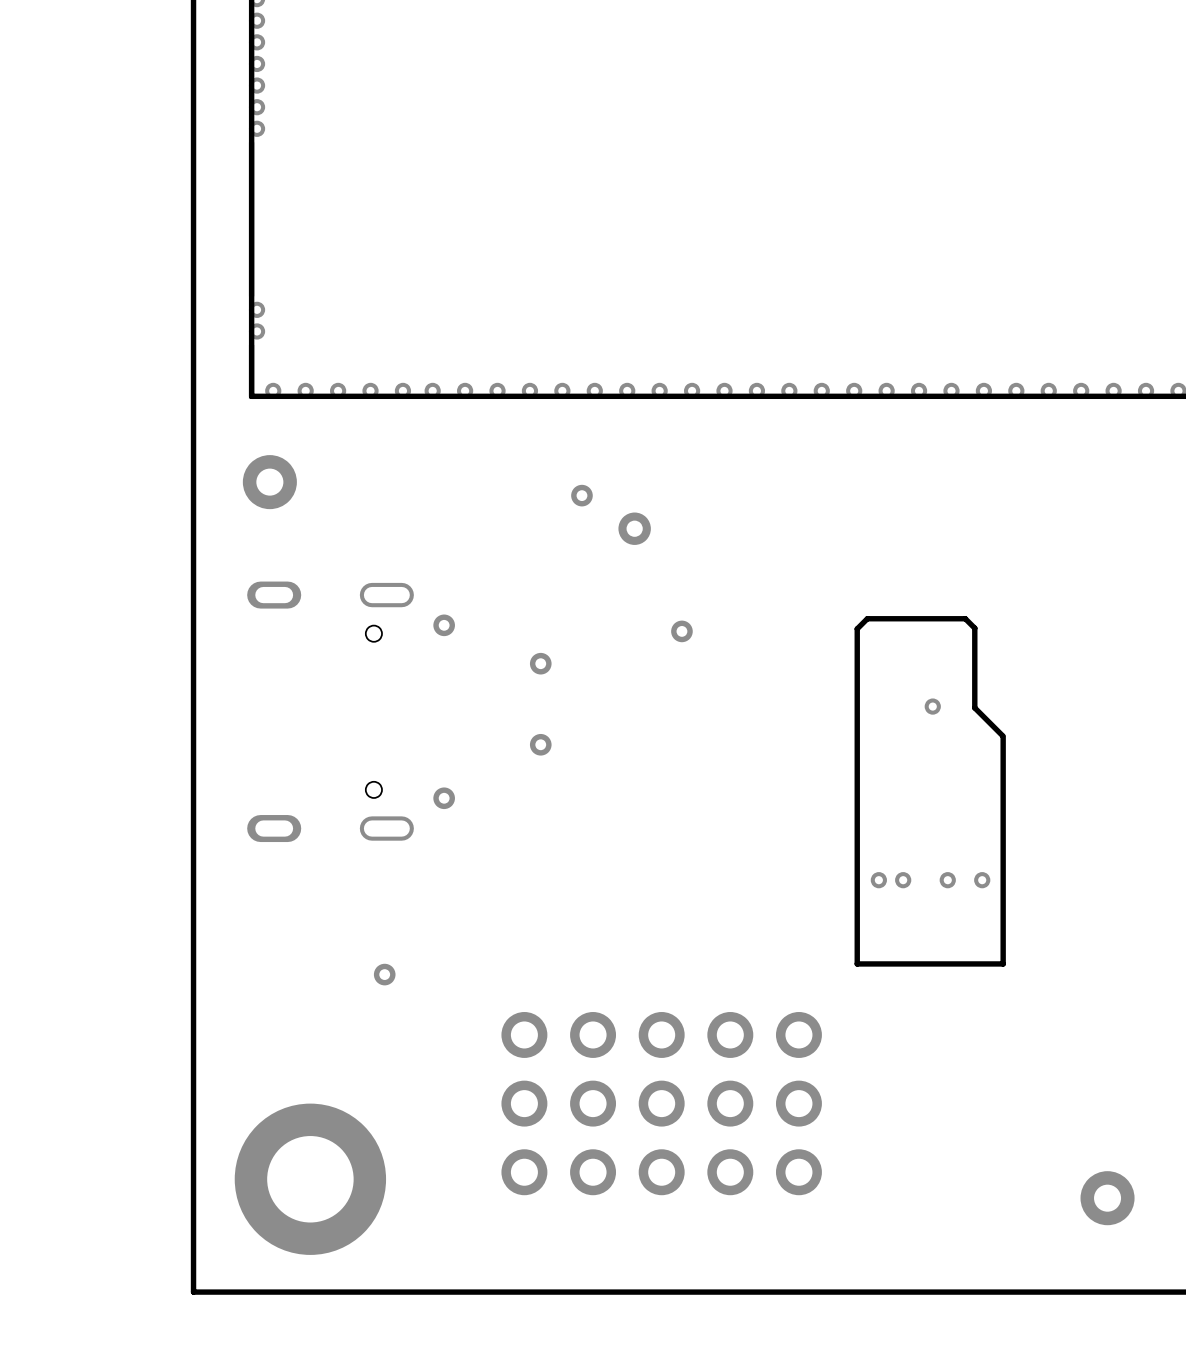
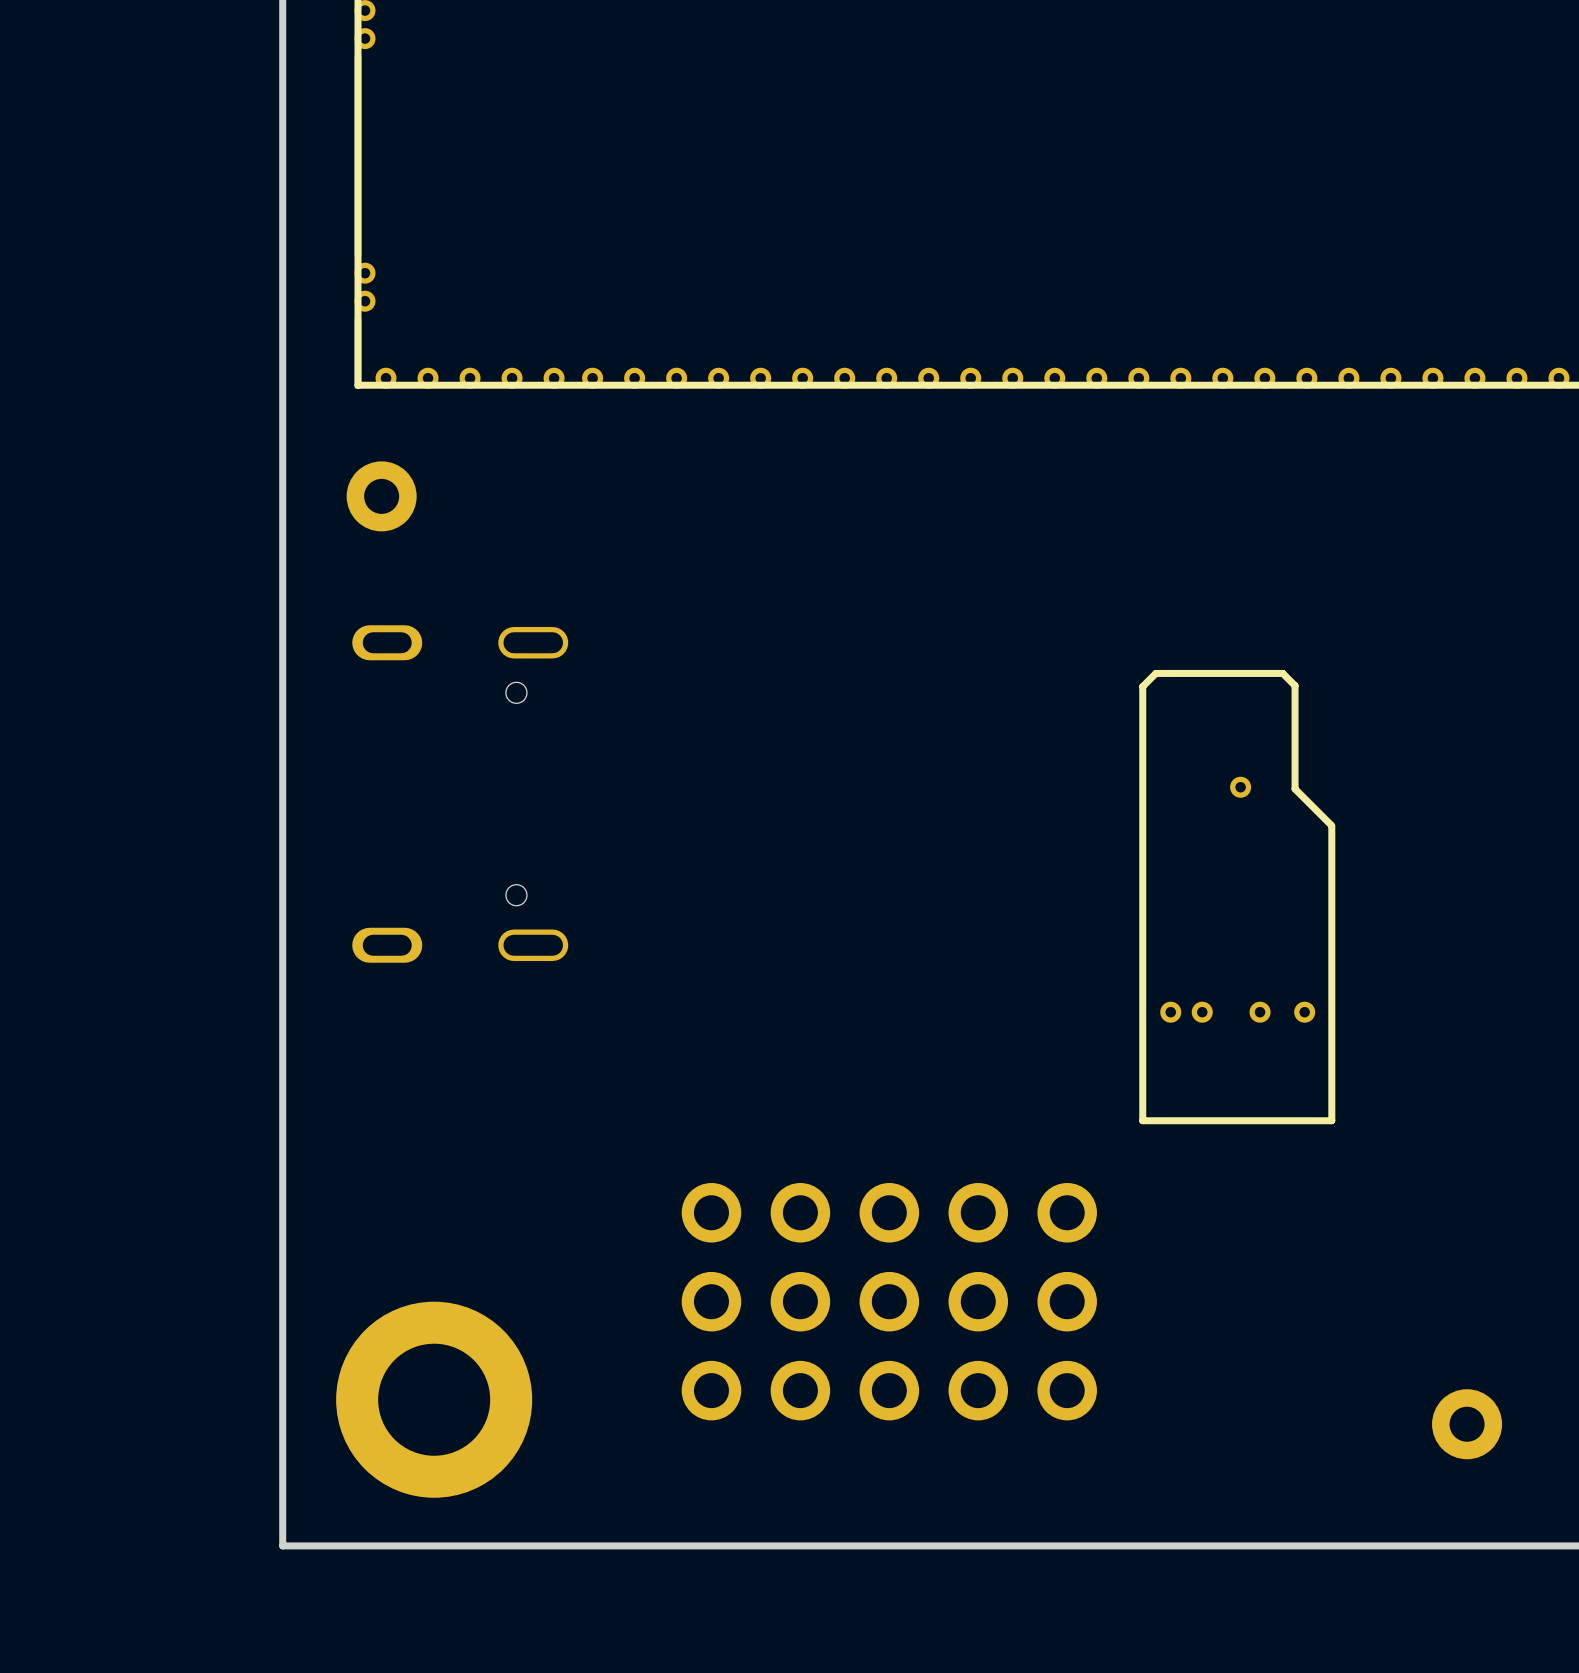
via: (581, 495) -> none
via: (634, 528) -> none
via: (444, 625) -> none
via: (681, 631) -> none
via: (540, 663) -> none
via: (540, 744) -> none
via: (444, 798) -> none
via: (384, 974) -> none

